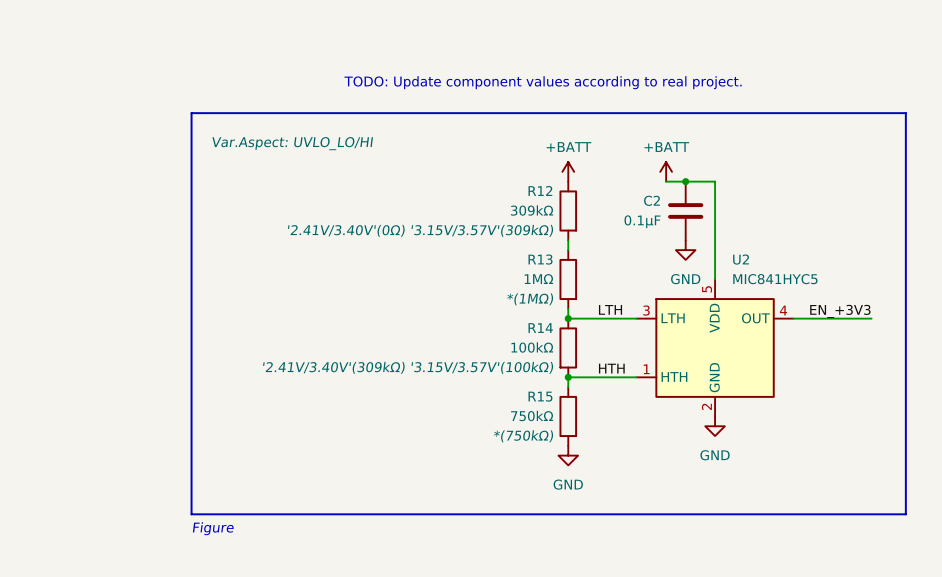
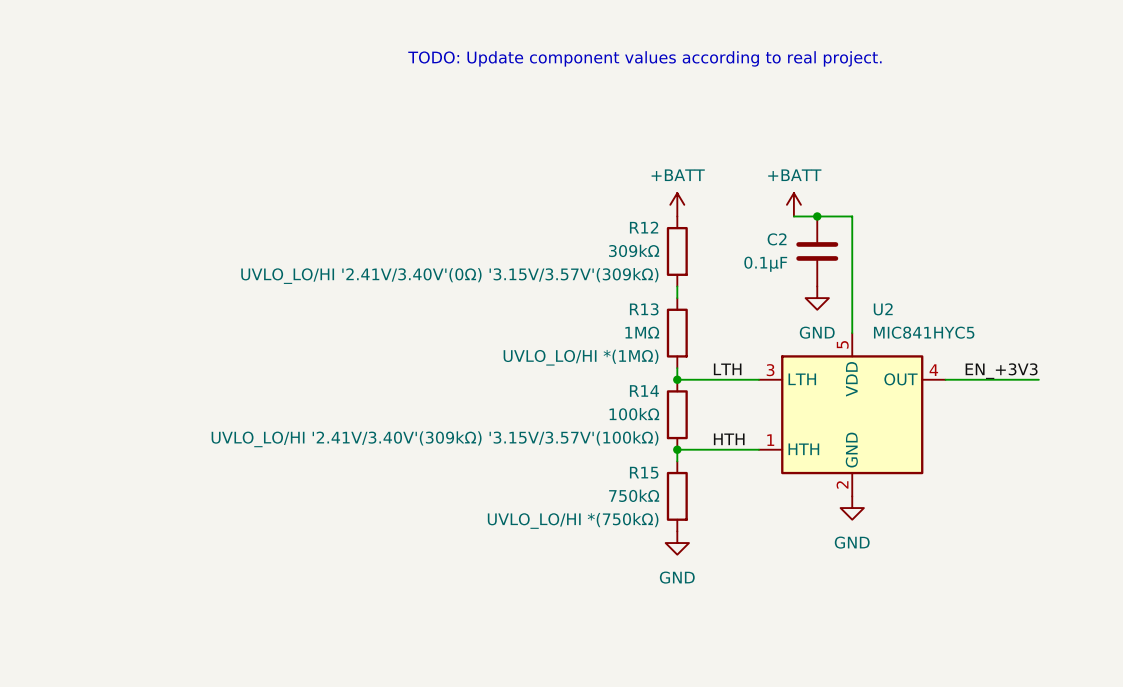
text position: TODO: Update component values according to real project. (543, 82) -> TODO: Update component values according to real project. (644, 58)
line: (191, 113) (905, 113) (905, 514) (191, 514) (191, 113) -> none
R12 text: Var.Aspect: UVLO_LO/HI (292, 143) -> none
R12 text: '2.41V/3.40V'(0Ω) '3.15V/3.57V'(309kΩ) (420, 230) -> UVLO_LO/HI '2.41V/3.40V'(0Ω) '3.15V/3.57V'(309kΩ) (449, 275)
R13 text: *(1MΩ) (530, 299) -> UVLO_LO/HI *(1MΩ) (581, 357)
R14 text: '2.41V/3.40V'(309kΩ) '3.15V/3.57V'(100kΩ) (408, 367) -> UVLO_LO/HI '2.41V/3.40V'(309kΩ) '3.15V/3.57V'(100kΩ) (435, 439)
R15 text: *(750kΩ) (523, 436) -> UVLO_LO/HI *(750kΩ) (573, 520)
text: Figure (213, 528) -> none

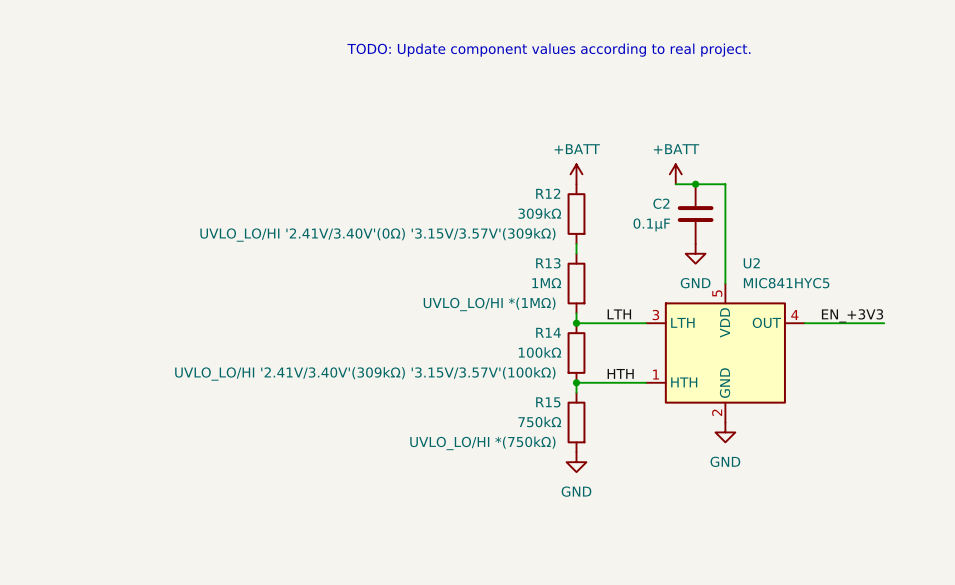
R12 text: none -> UVLO_LO/HI '2.41V/3.40V'(0Ω) '3.15V/3.57V'(309kΩ) (377, 234)
R12 text: UVLO_LO/HI '2.41V/3.40V'(0Ω) '3.15V/3.57V'(309kΩ) (449, 275) -> none
R13 text: none -> UVLO_LO/HI *(1MΩ) (489, 304)
R13 text: UVLO_LO/HI *(1MΩ) (581, 357) -> none
R14 text: none -> UVLO_LO/HI '2.41V/3.40V'(309kΩ) '3.15V/3.57V'(100kΩ) (365, 373)
R14 text: UVLO_LO/HI '2.41V/3.40V'(309kΩ) '3.15V/3.57V'(100kΩ) (435, 439) -> none
R15 text: none -> UVLO_LO/HI *(750kΩ) (482, 443)
R15 text: UVLO_LO/HI *(750kΩ) (573, 520) -> none

